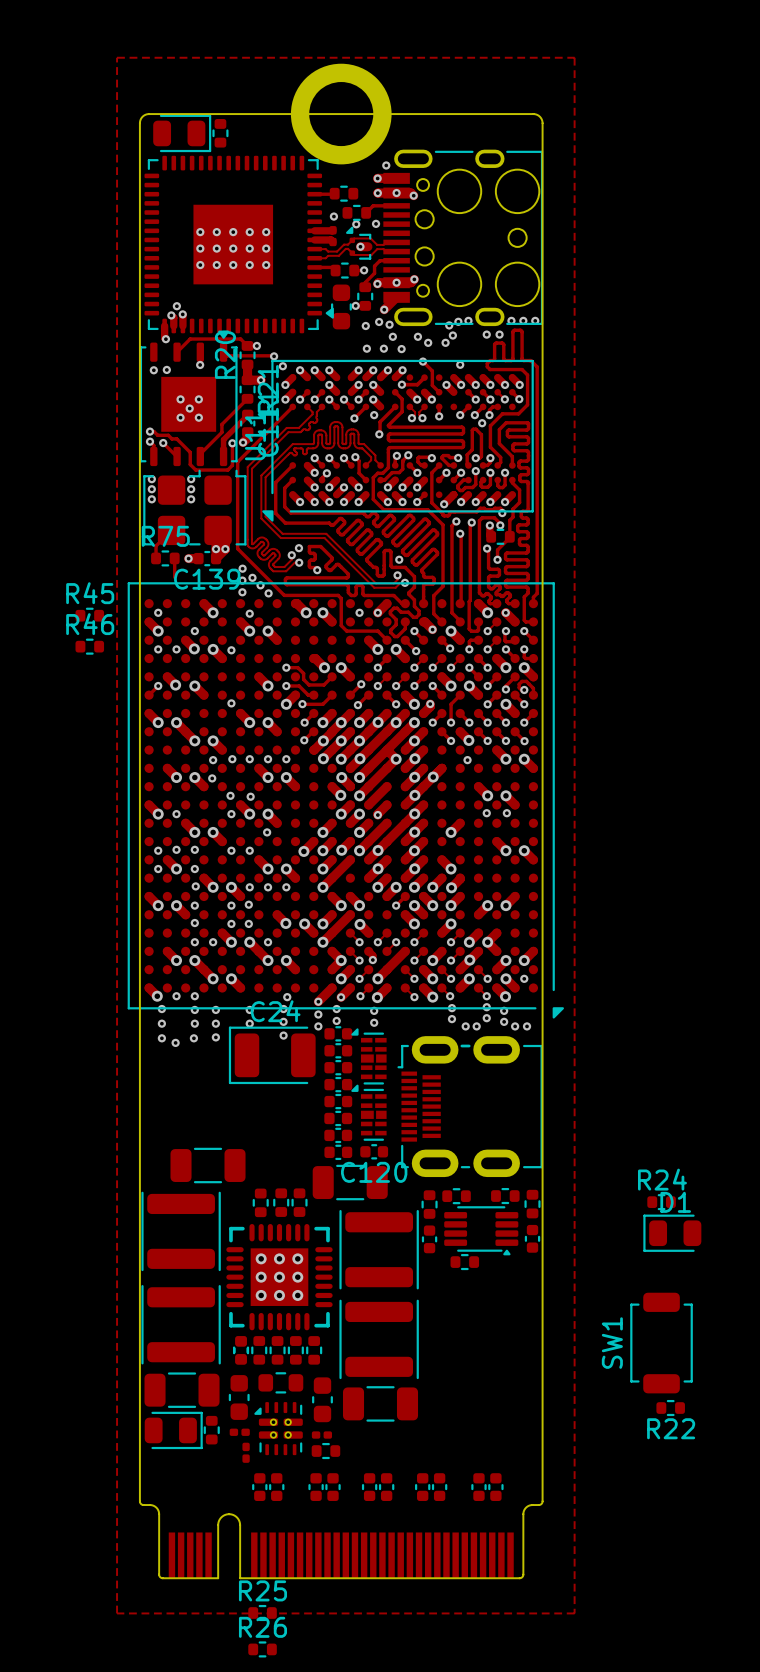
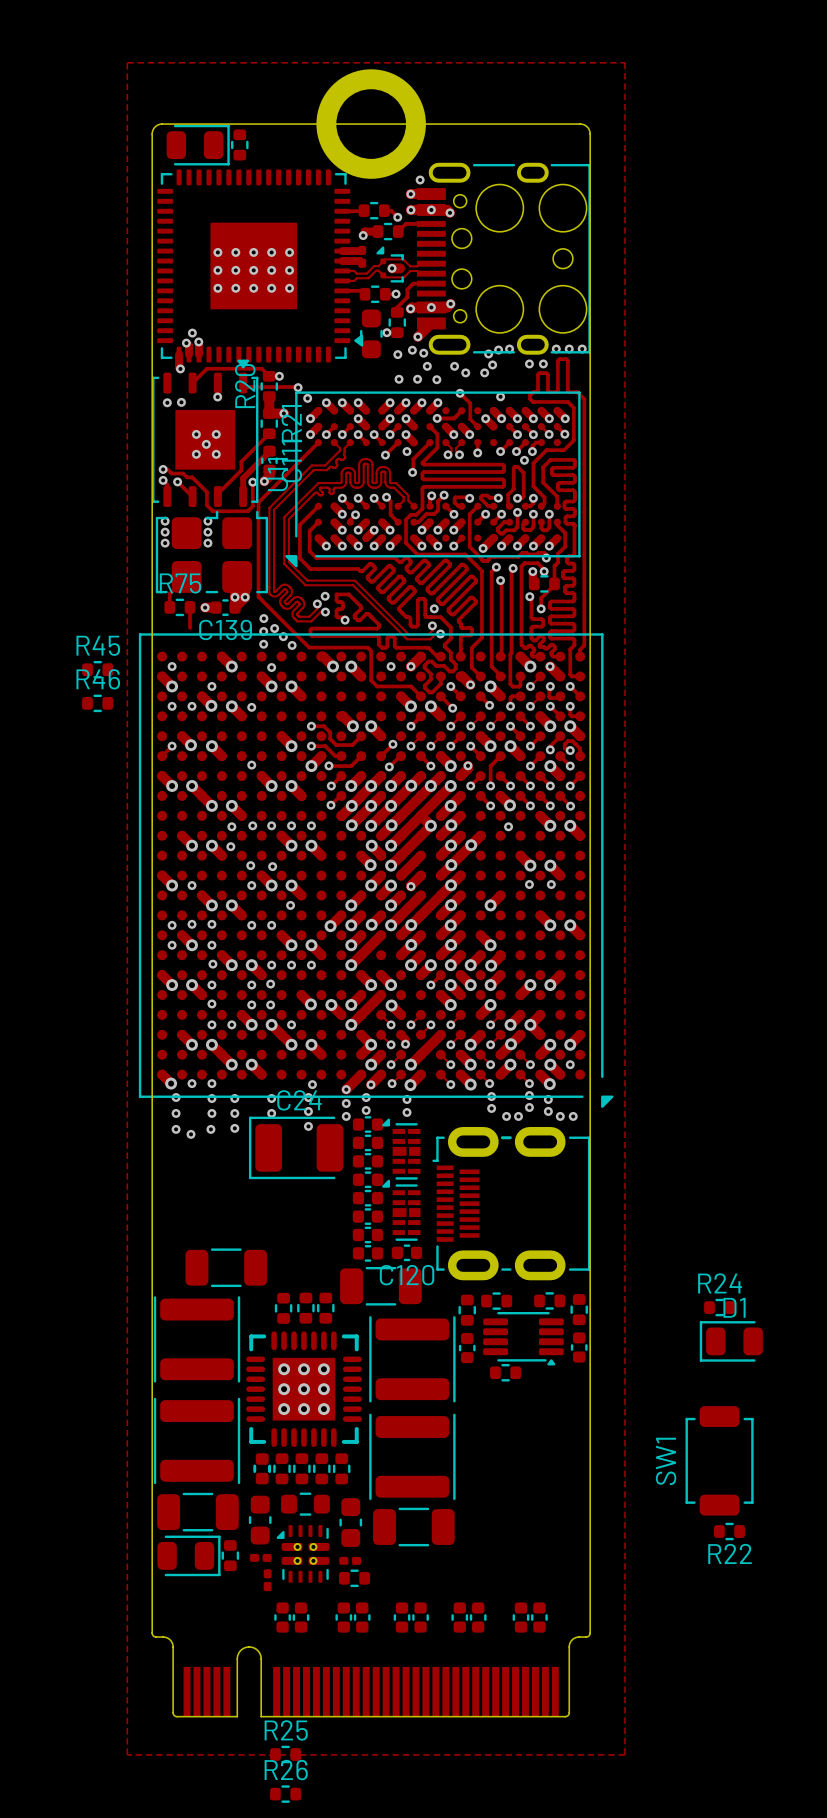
track: none -> (384, 210) (391, 210) (397, 217)
via: none -> (397, 217)
track: none -> (364, 231) (377, 231)
via: (376, 223) -> none
via: (356, 224) -> none

